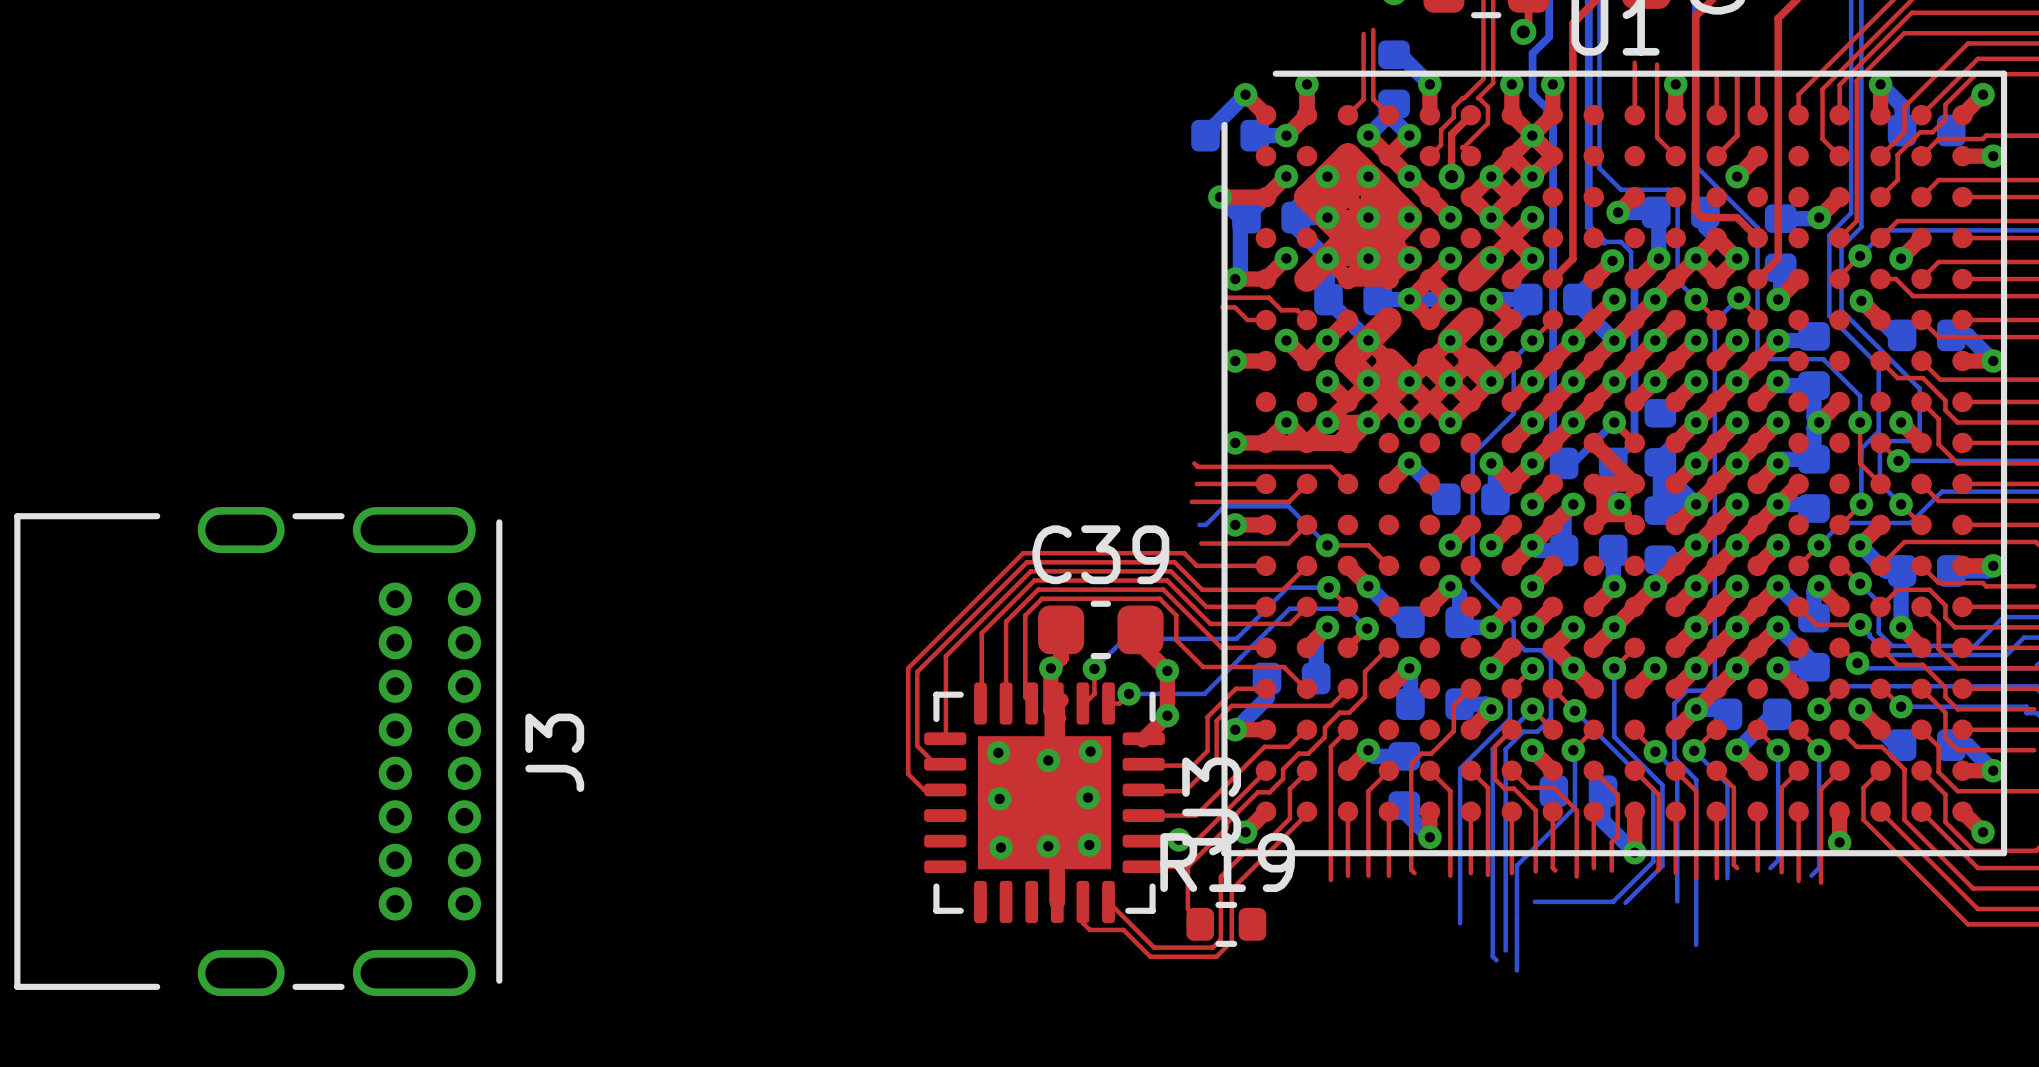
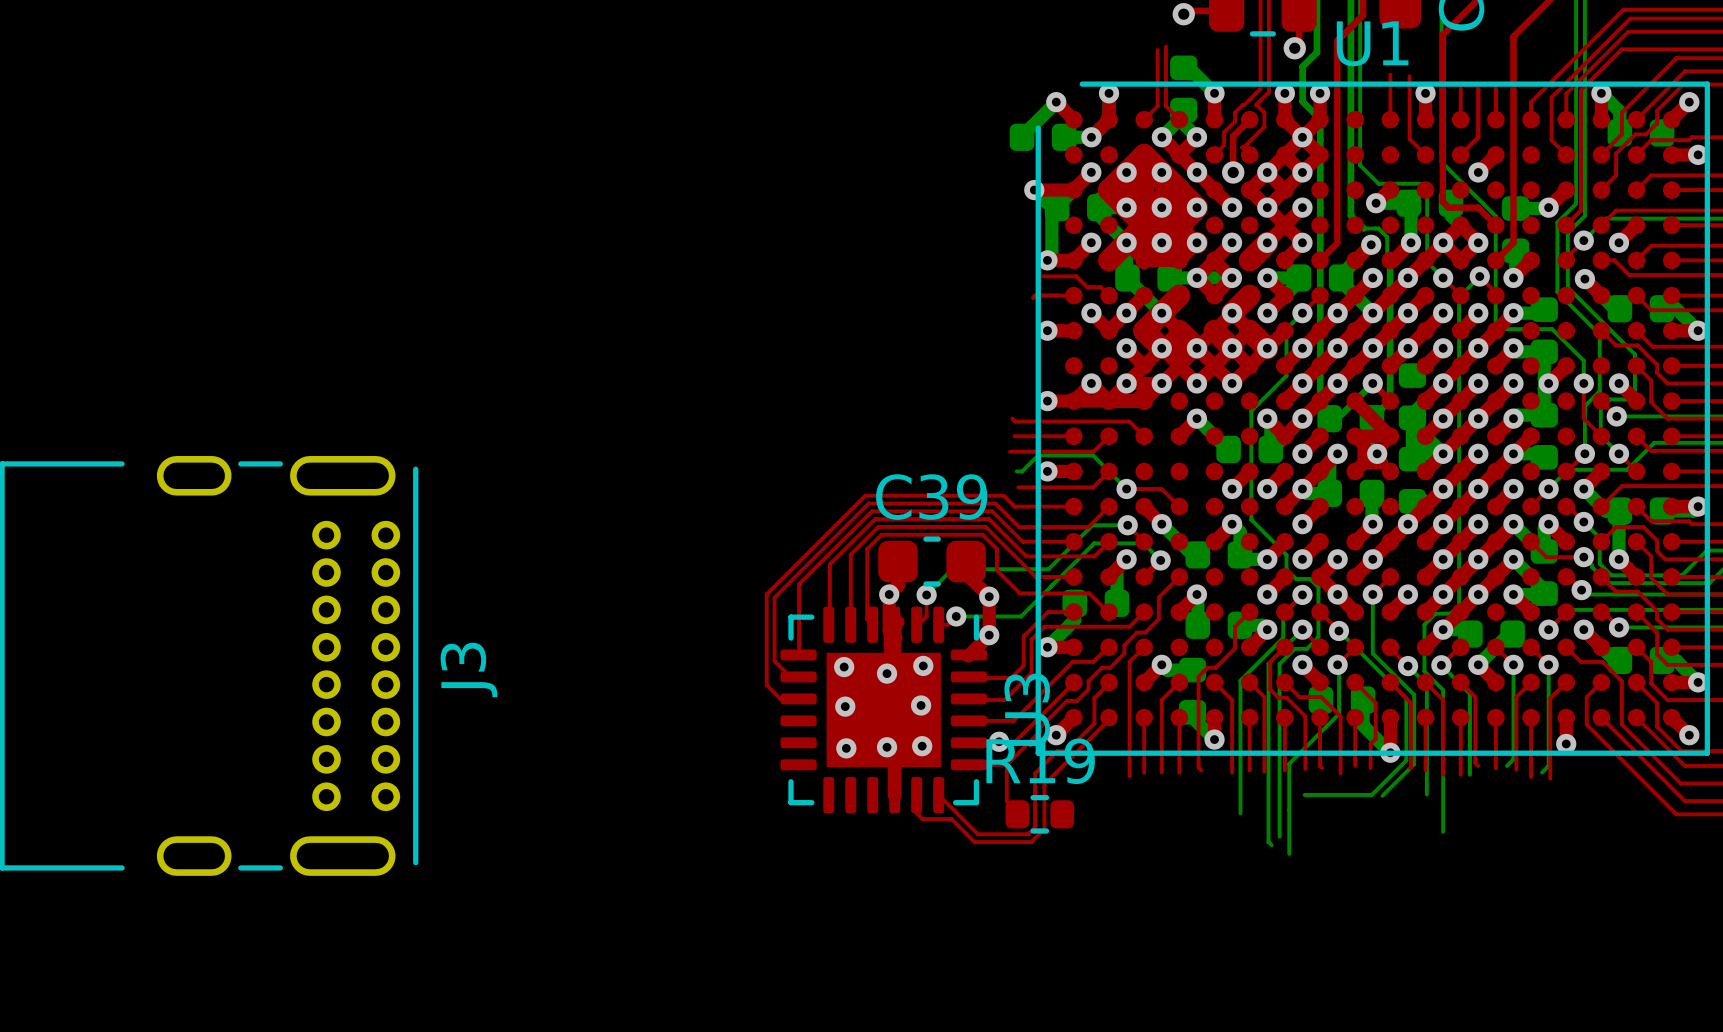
top track: (1222, 307) (1234, 307) (1247, 320) -> (1033, 297) (1035, 295) (1058, 295)

